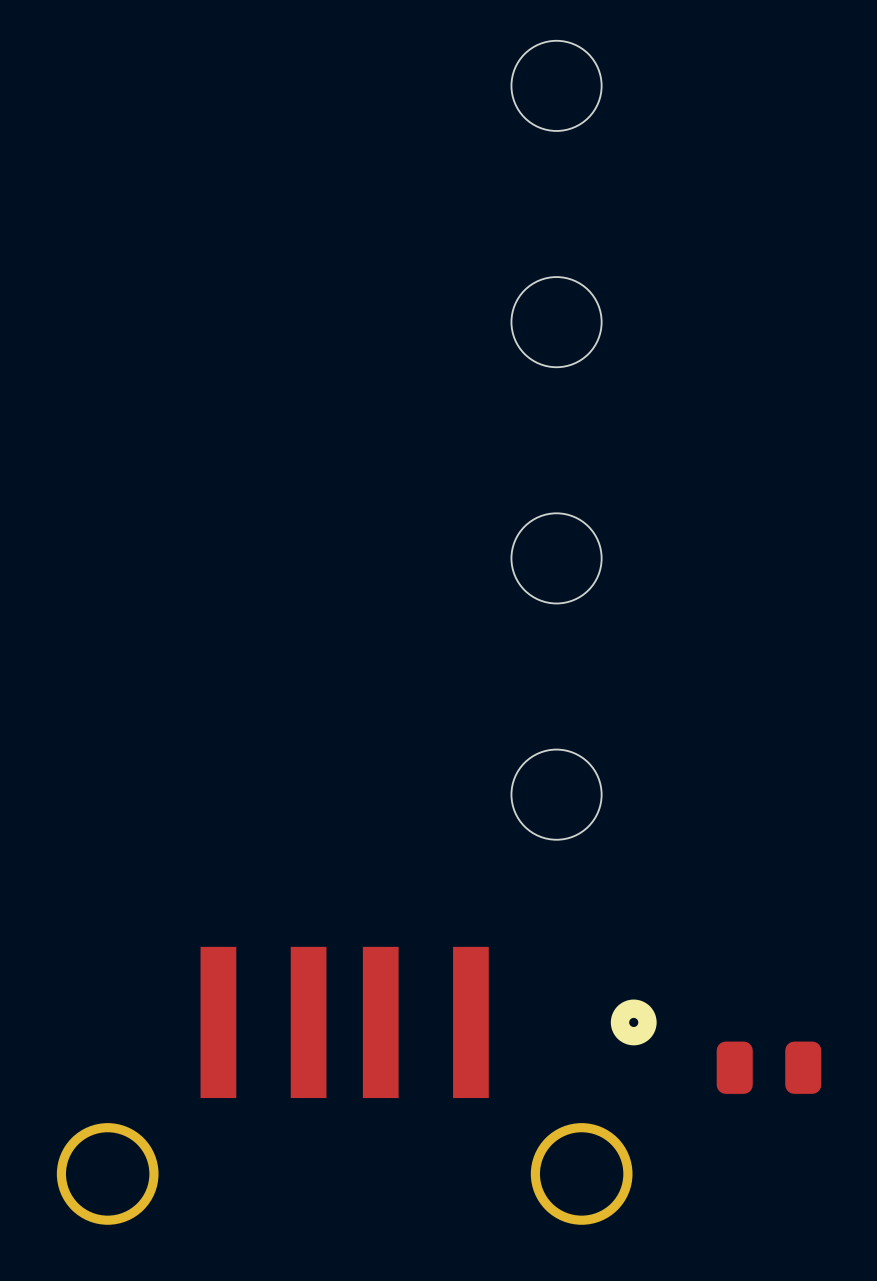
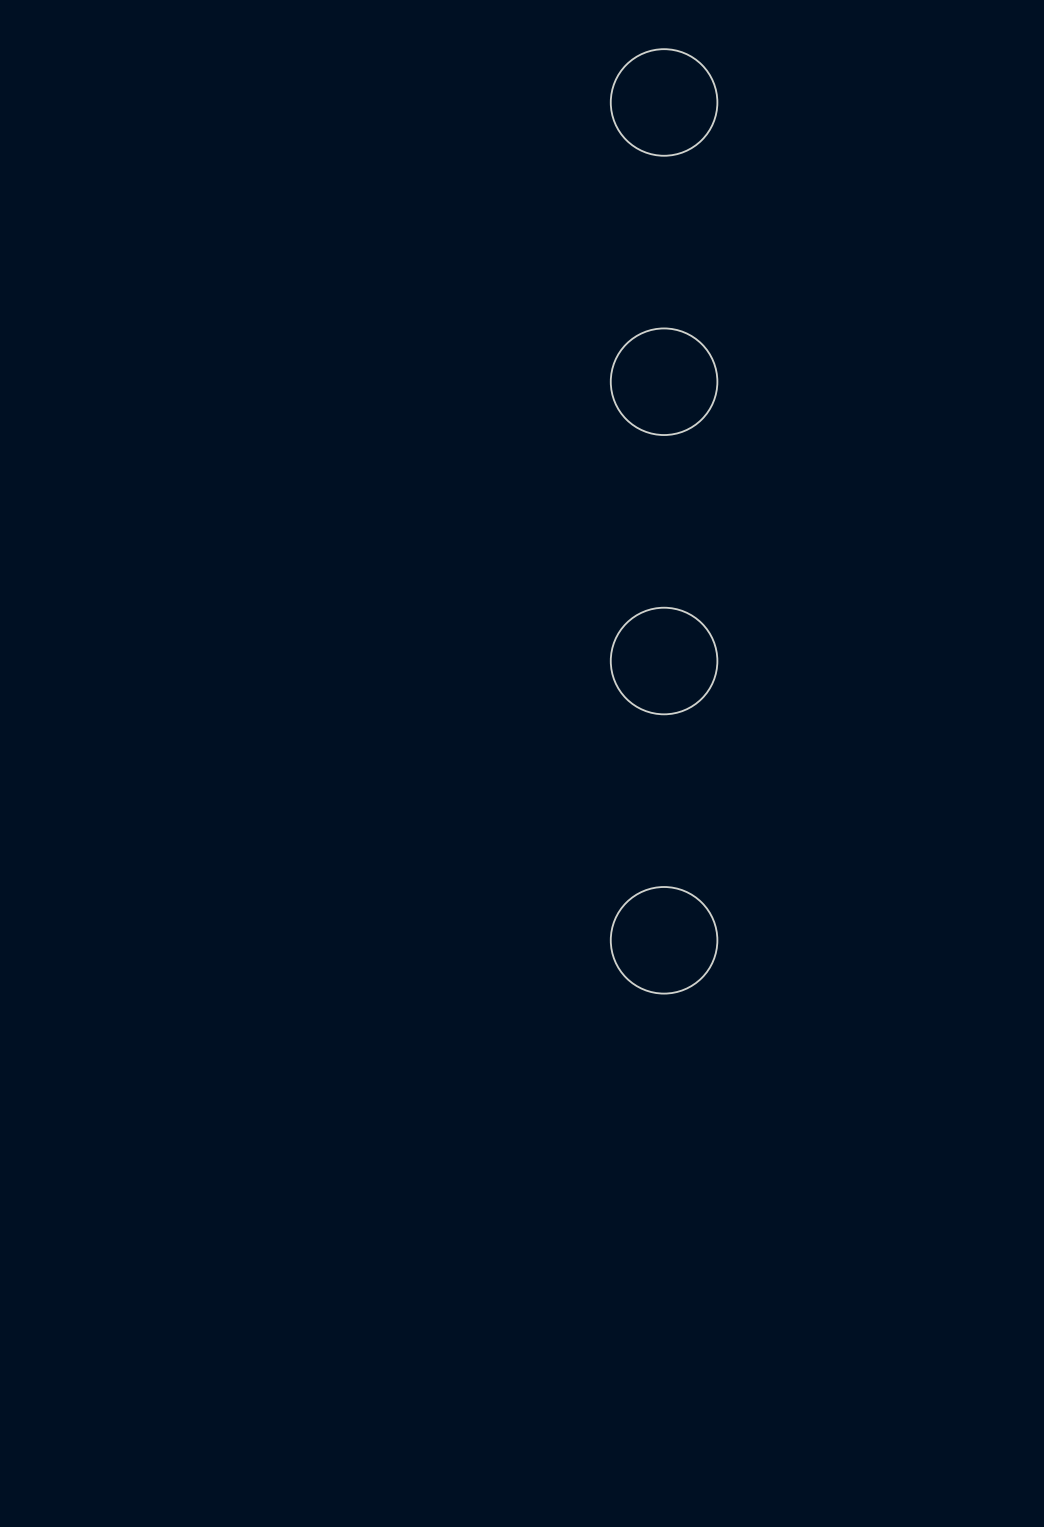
part: (769, 1067) -> none
part: (356, 1085) -> none

